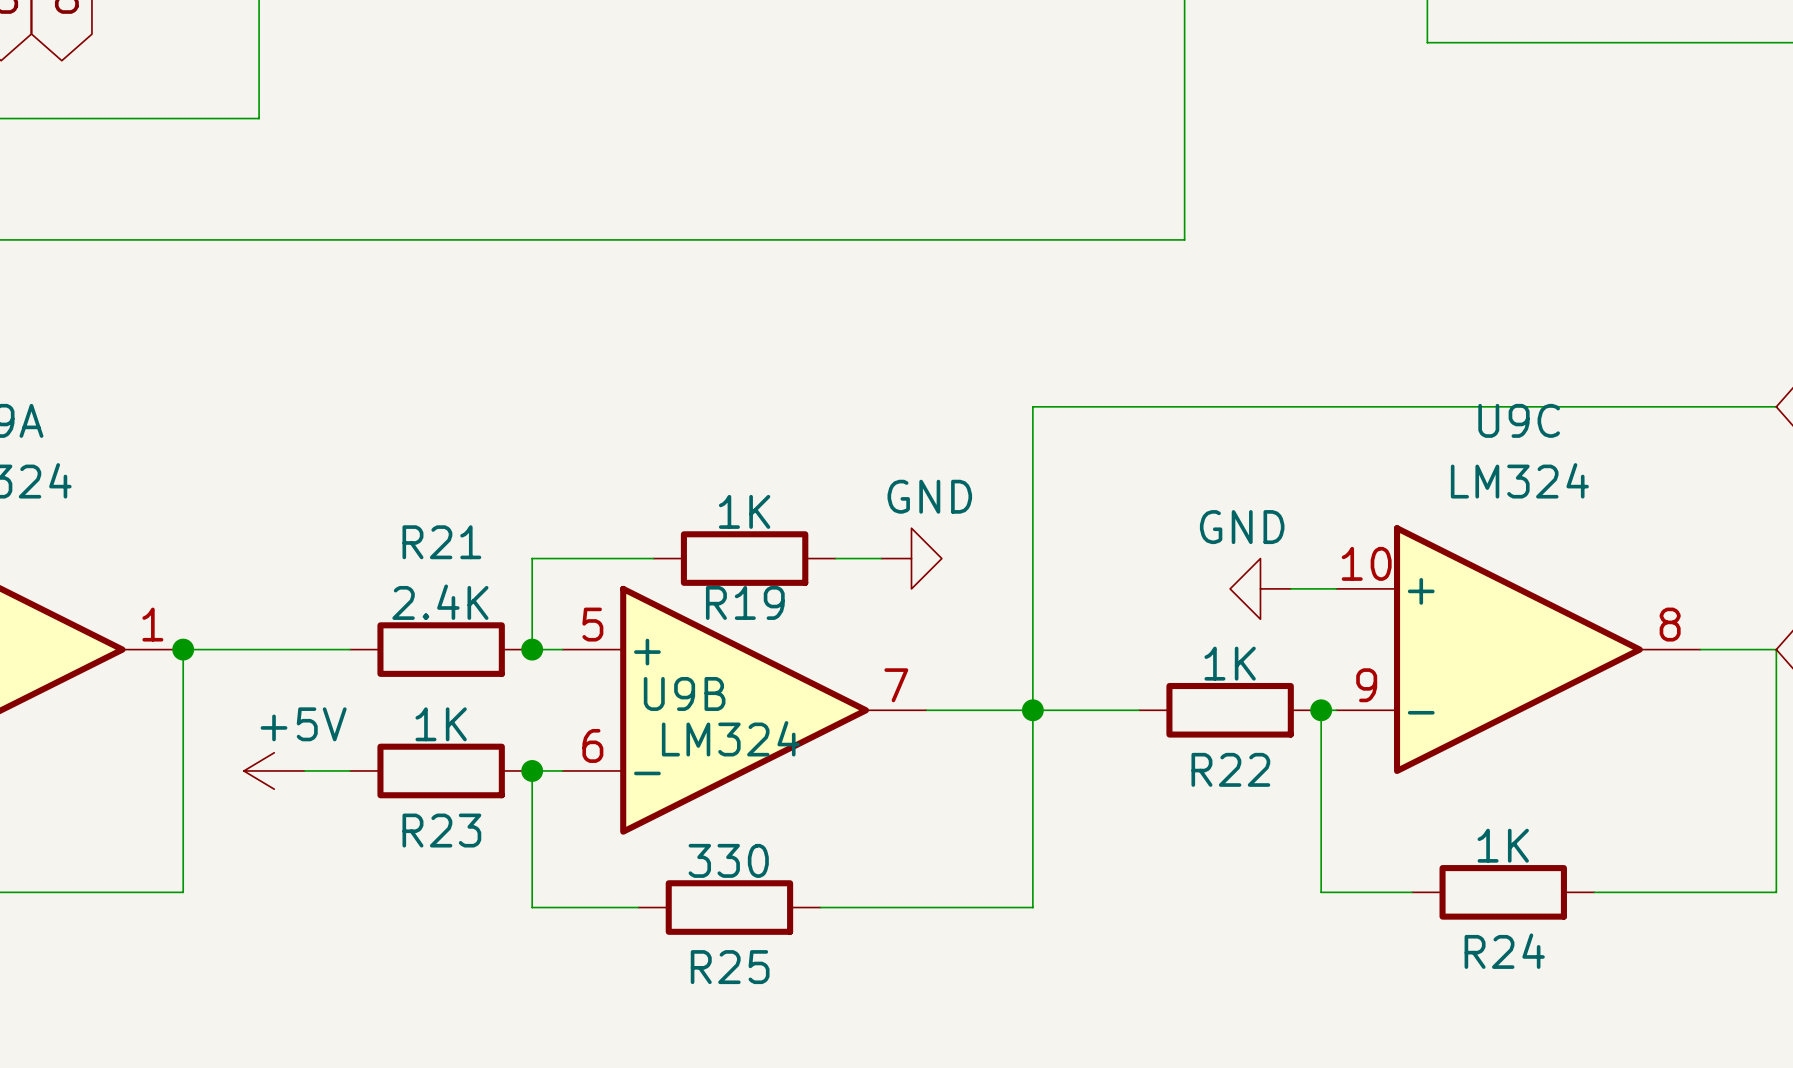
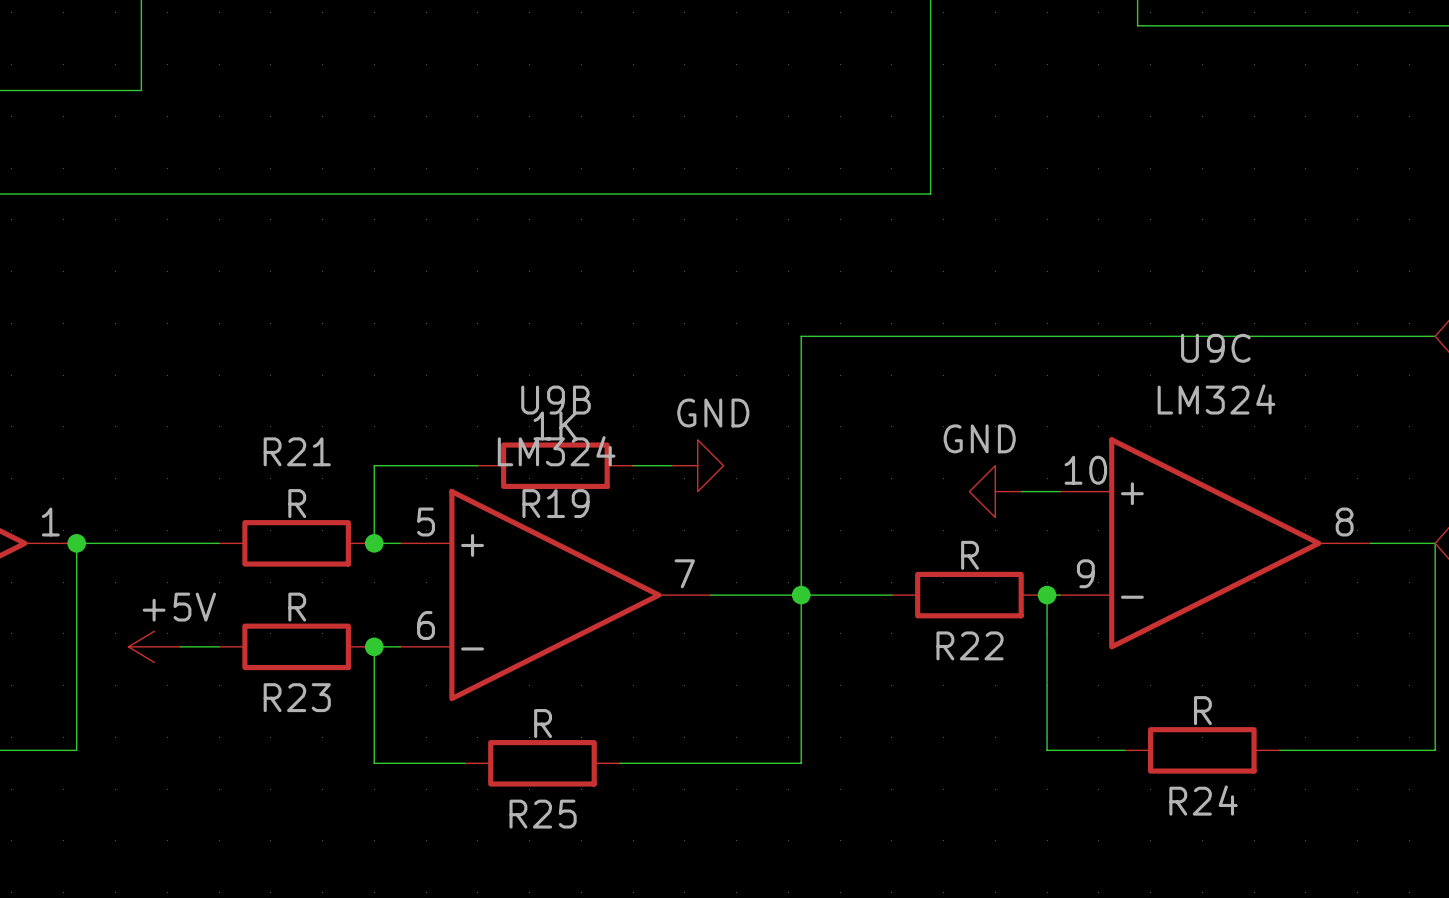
R21 value: 2.4K (440, 602) -> R (297, 503)
R22 value: 1K (1230, 663) -> R (970, 555)
U9B name position: U9B (684, 693) -> U9B (556, 400)
R23 value: 1K (441, 724) -> R (297, 607)
U9B value position: LM324 (730, 738) -> LM324 (556, 451)
R24 value: 1K (1503, 845) -> R (1202, 710)
R25 value: 330 (728, 860) -> R (543, 723)

